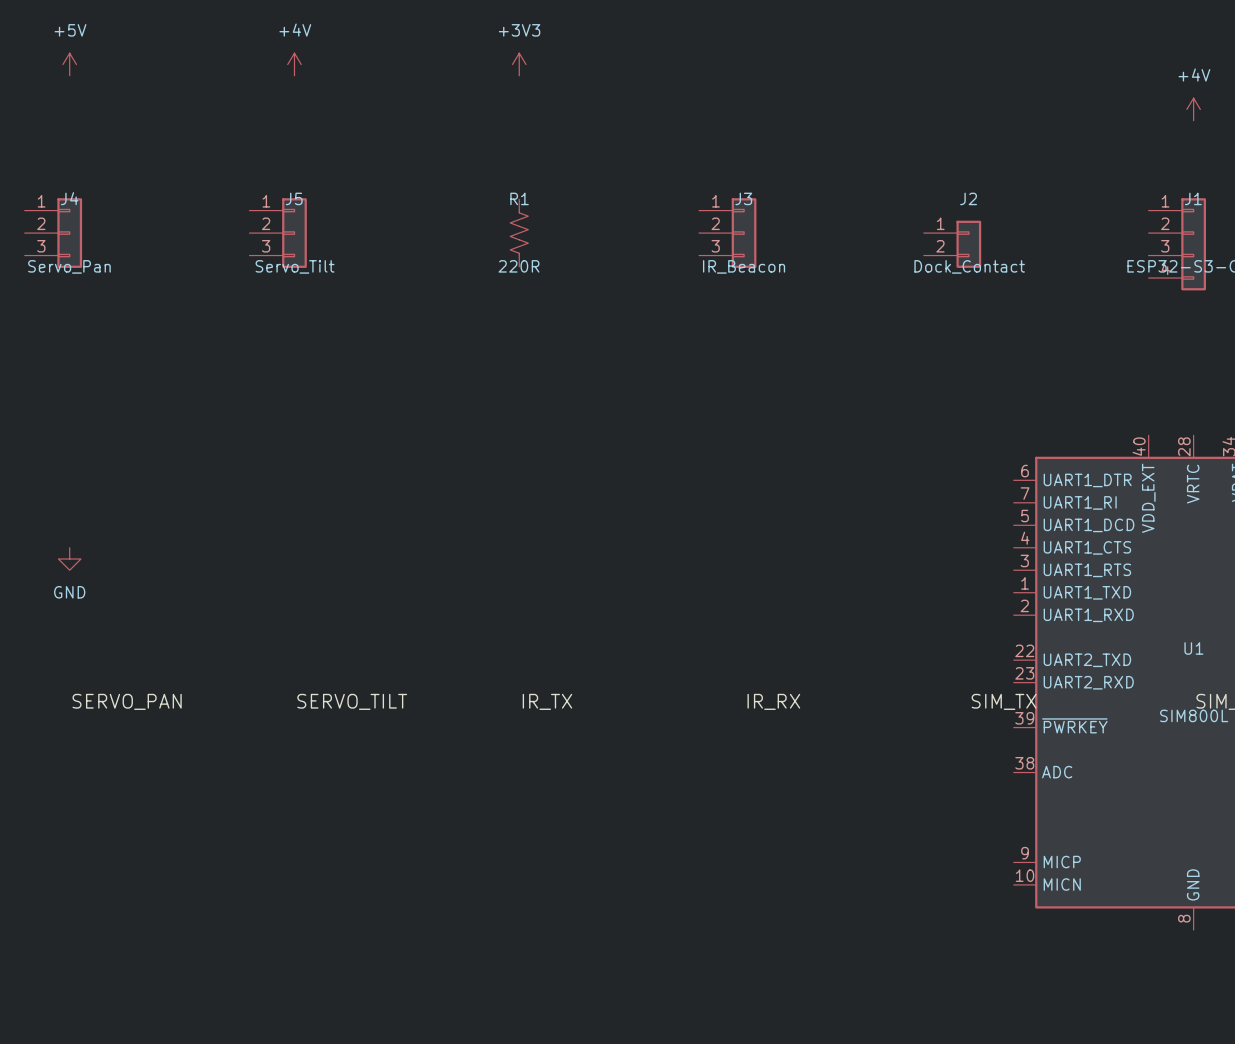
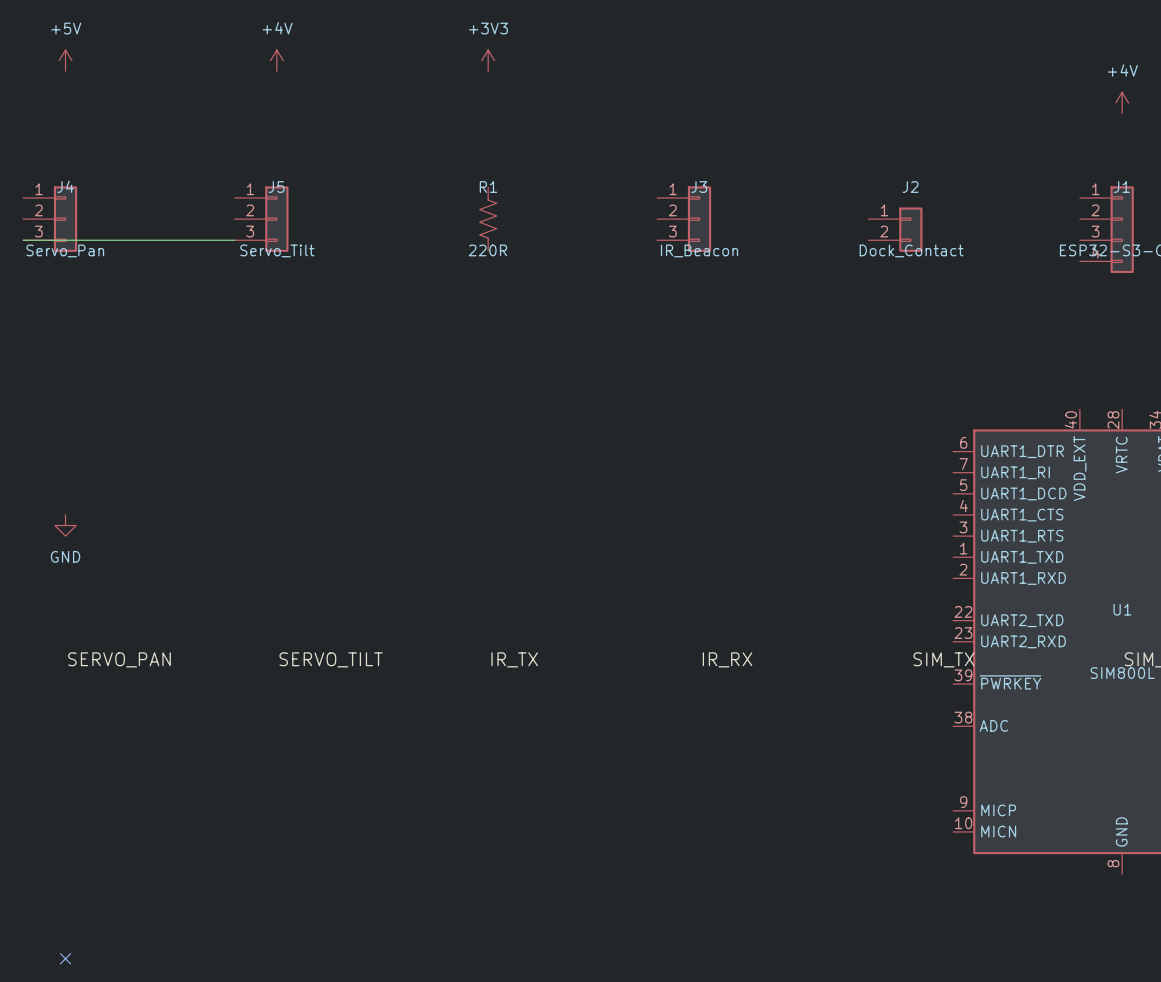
wire: none -> (23, 240) (234, 240)
no-connect mark: none -> (65, 958)

